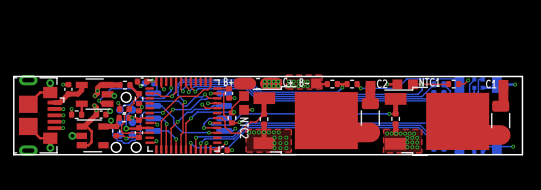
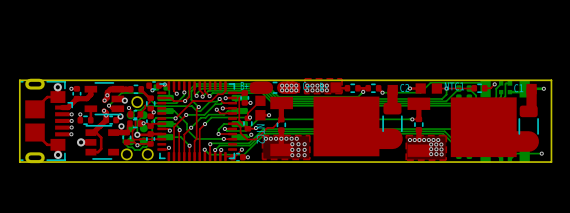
part footprint: [252, 86, 358, 156] -> [270, 96, 380, 157]
part footprint: [384, 86, 490, 156] -> [407, 97, 517, 158]

